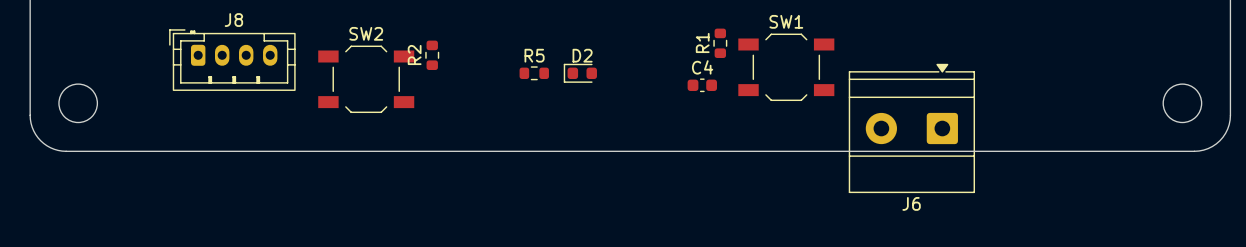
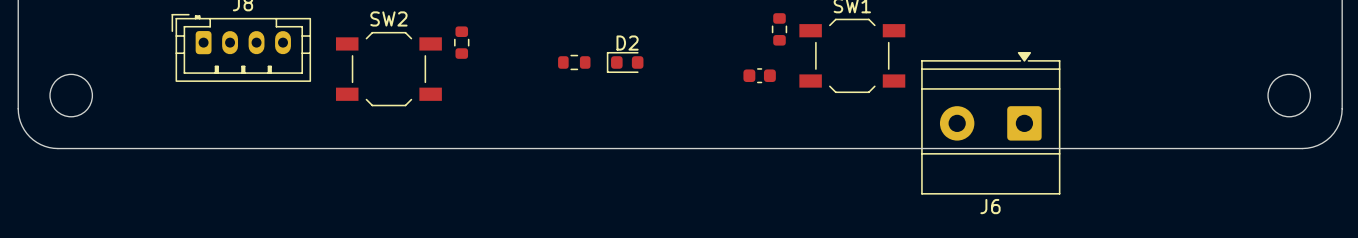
R1 name: R1 (702, 43) -> none
R2 name: R2 (414, 55) -> none
R5 name: R5 (534, 55) -> none
C4 name: C4 (702, 67) -> none

